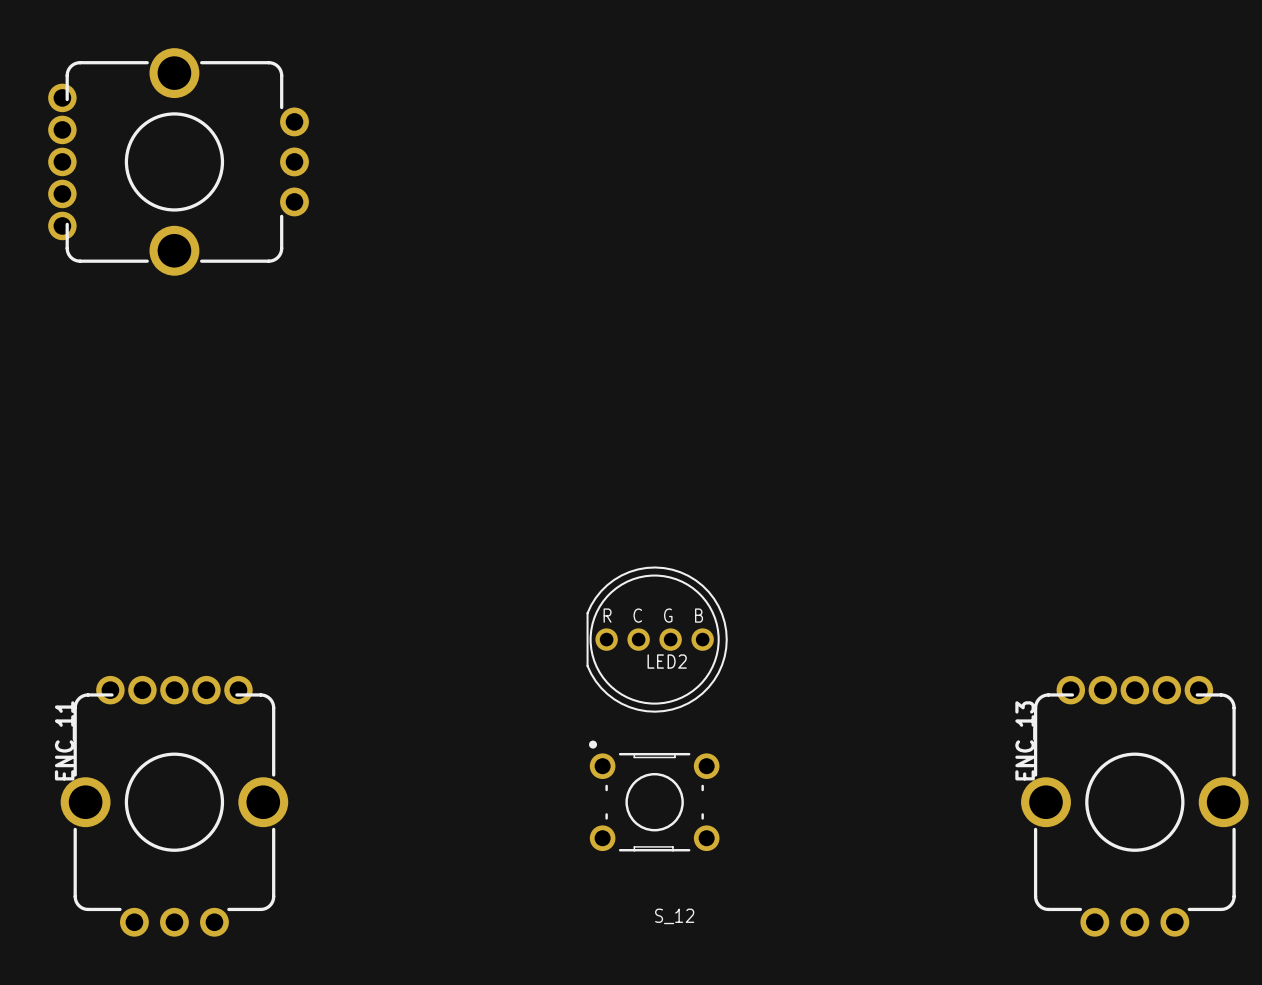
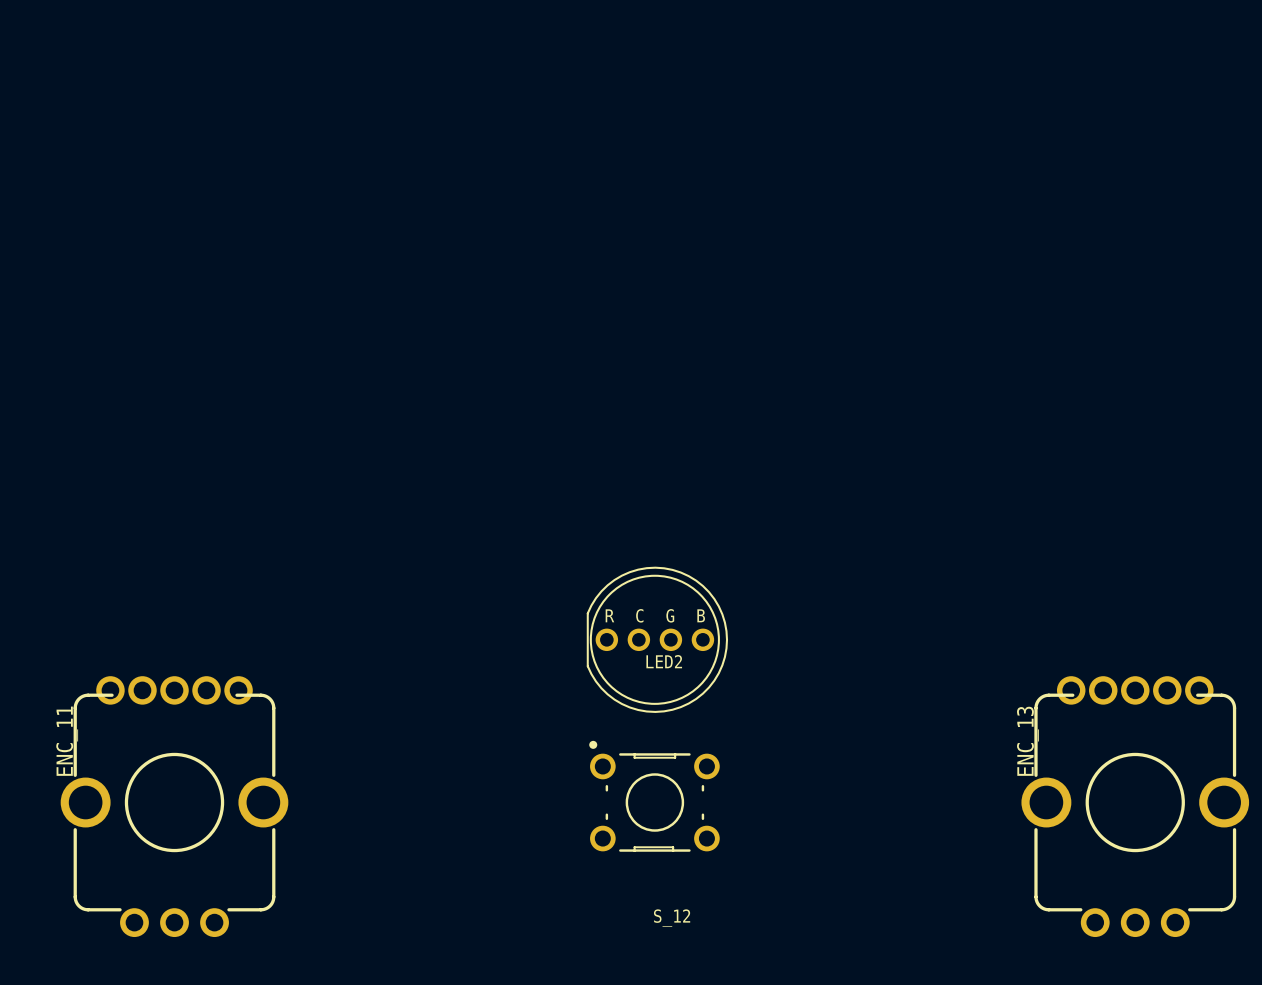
part: (178, 161) -> none

